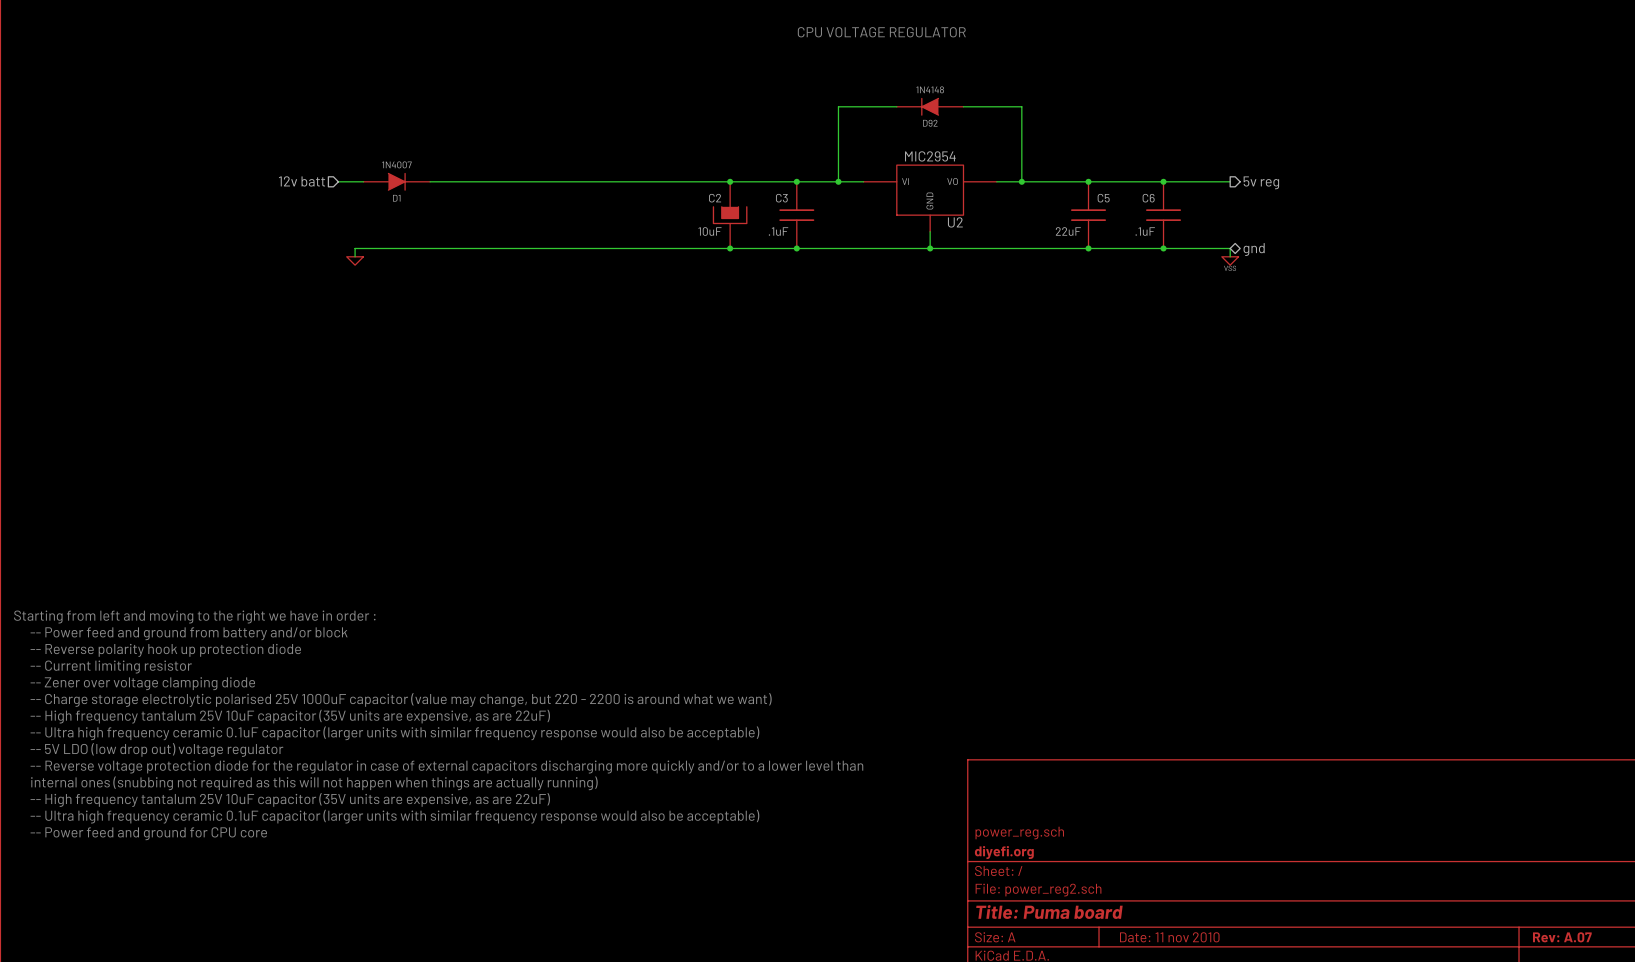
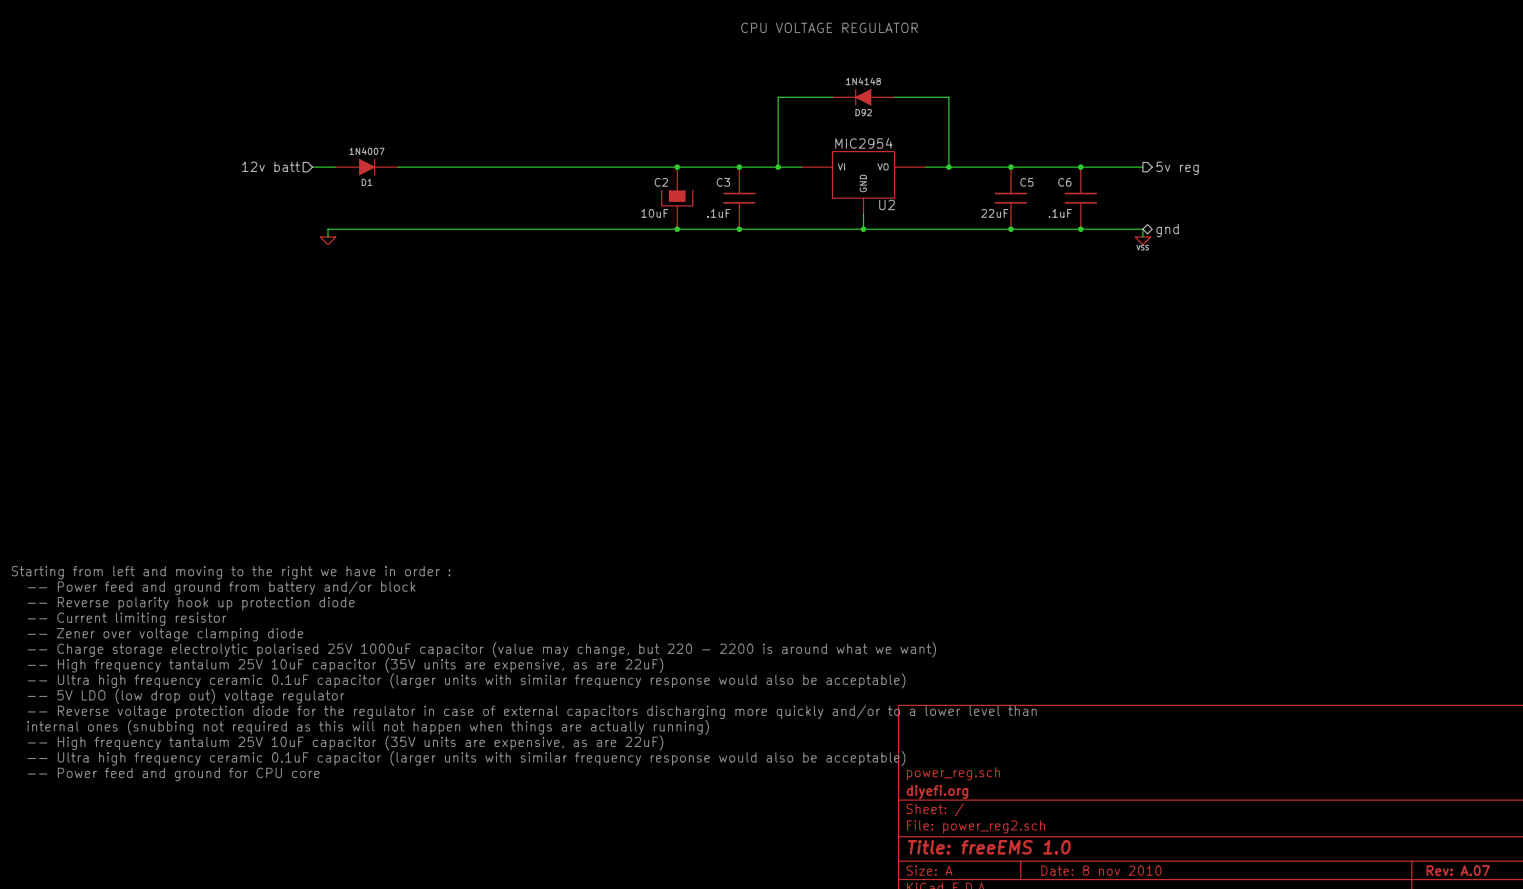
title block: Title: Puma board (1049, 912) -> Title: freeEMS 1.0 (989, 847)
title block: Date: 11 nov 2010 (1169, 937) -> Date: 8 nov 2010 (1101, 870)

